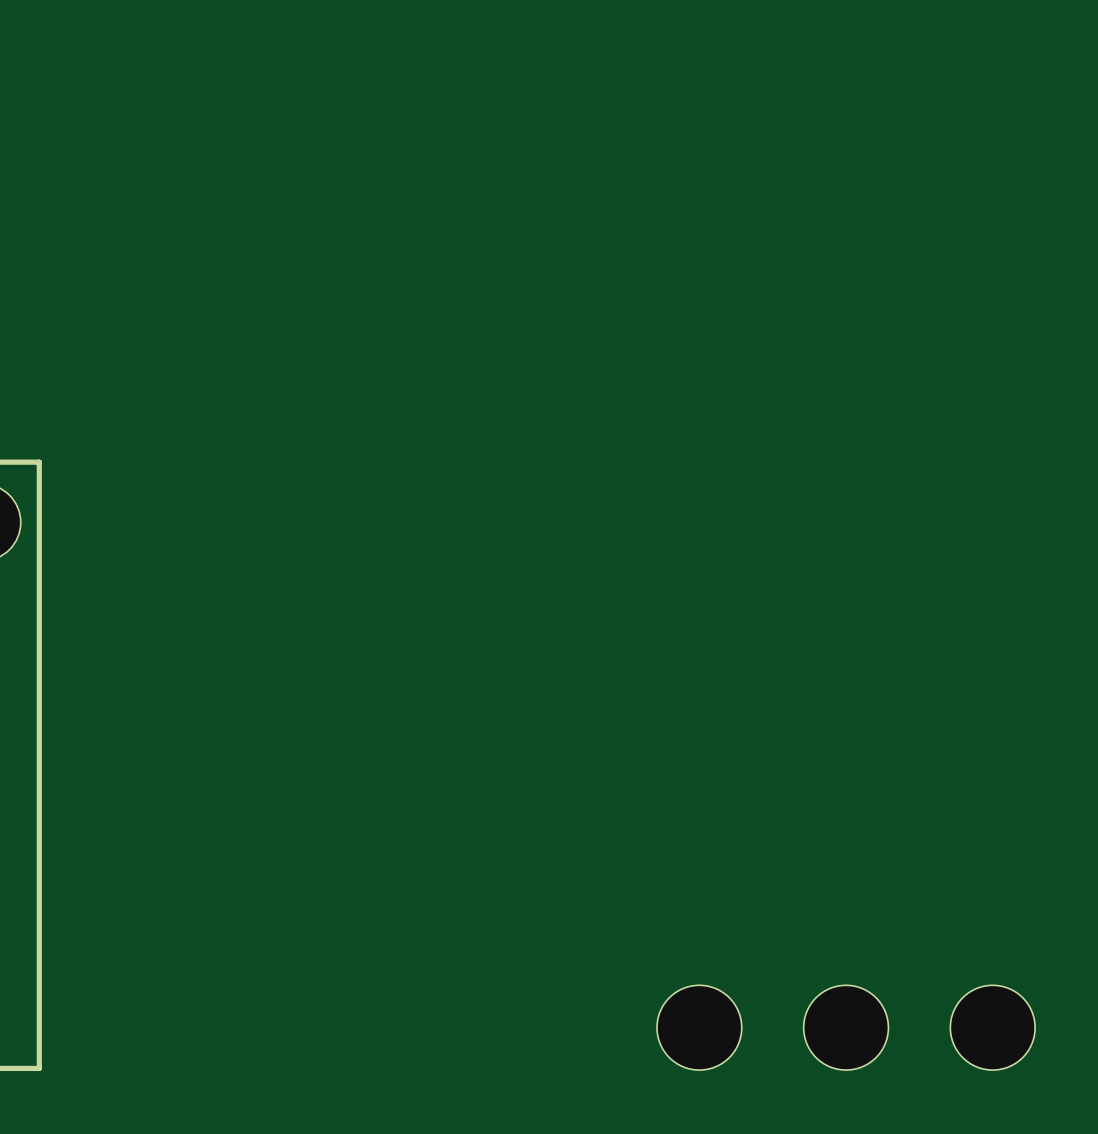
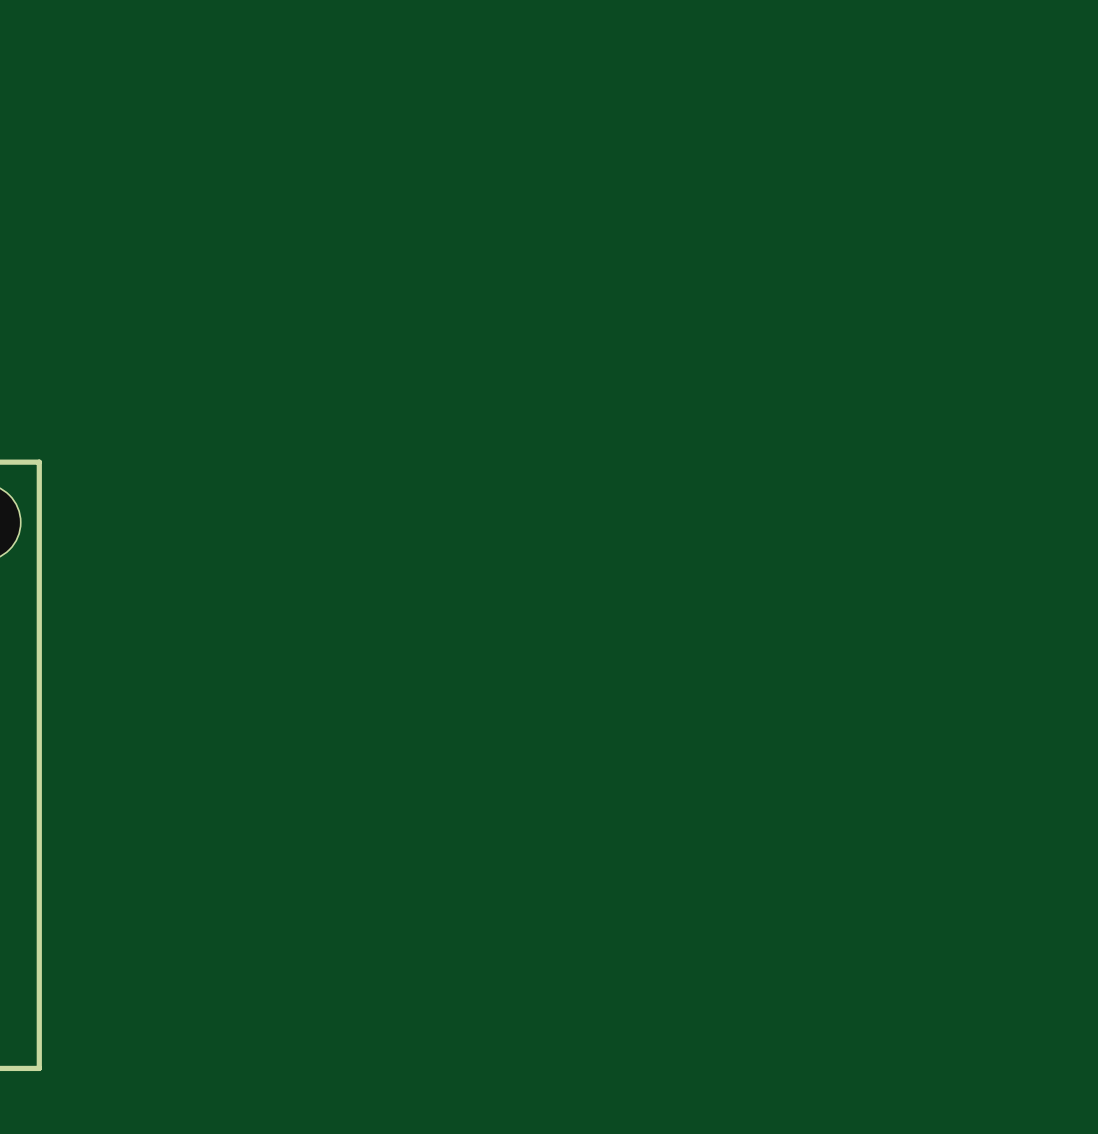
part: (699, 1027) -> none
part: (846, 1027) -> none
part: (992, 1027) -> none

